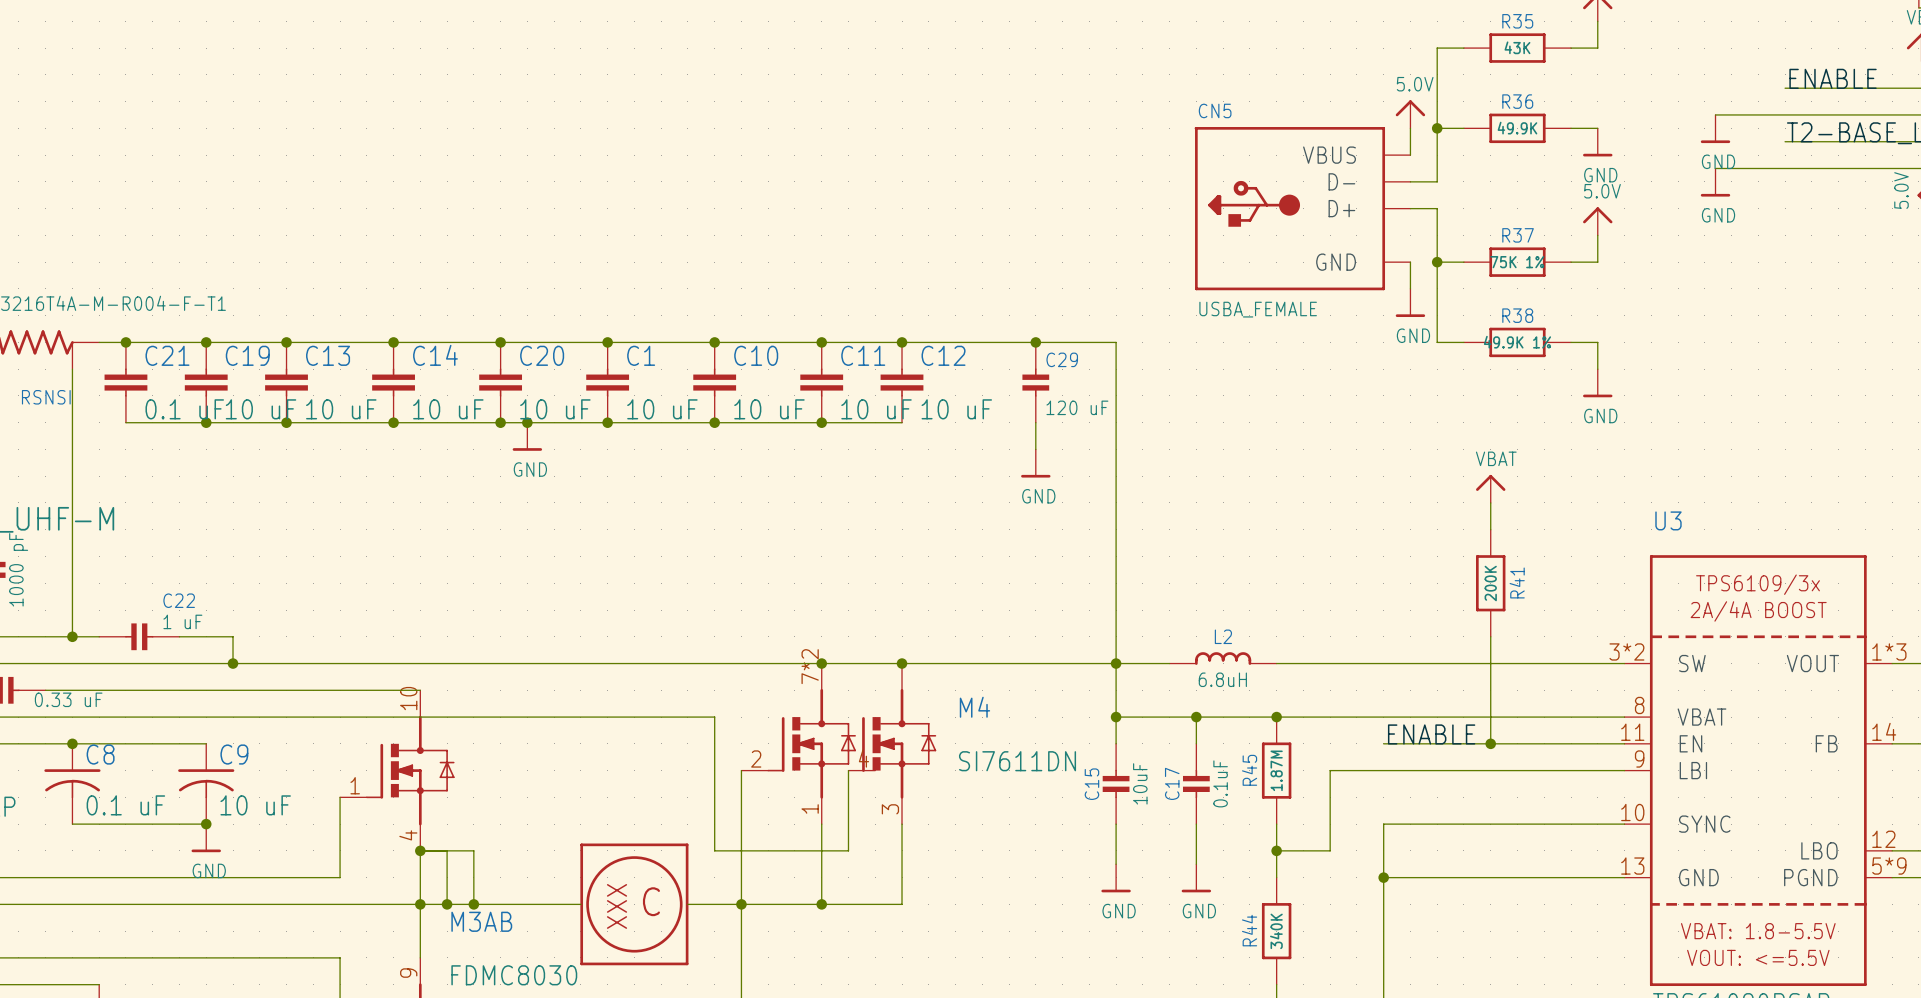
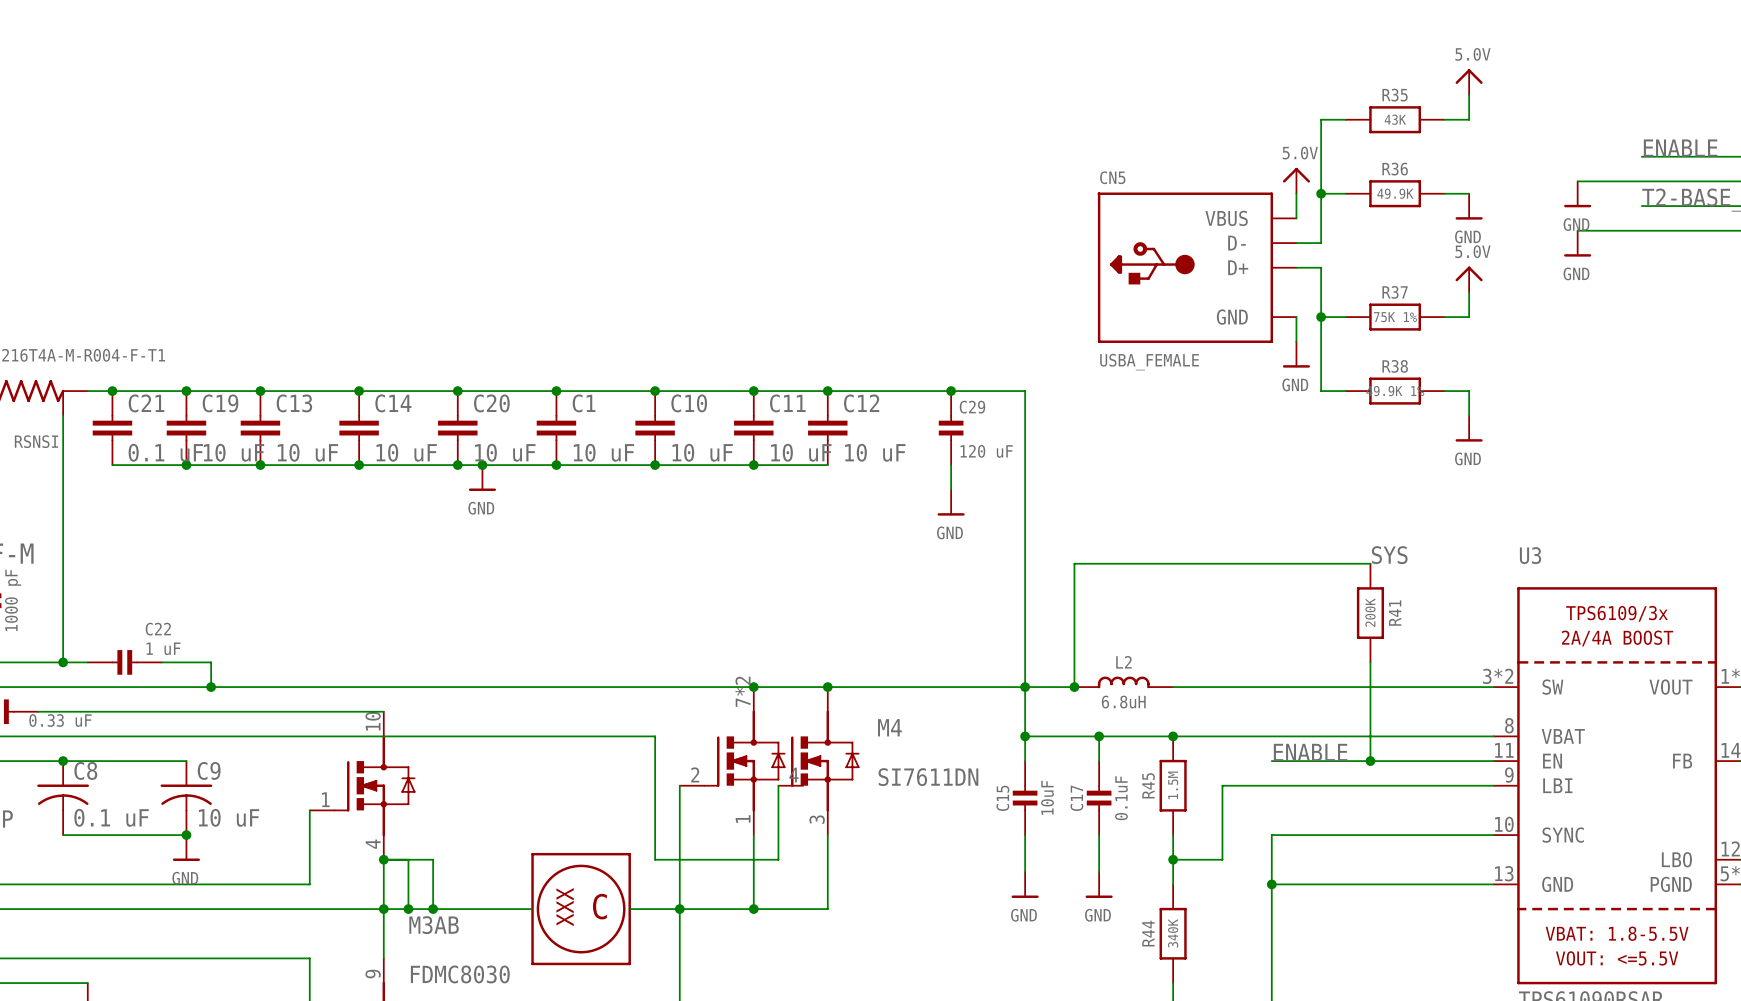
power symbol: VBAT (1490, 488) -> none
wire: (1490, 502) (1490, 529) -> (1074, 687) (1074, 563) (1370, 563)
label: none -> SYS (1389, 555)
junction: none -> (1074, 687)
R45 value: 1.87M (1276, 770) -> 1.5M (1173, 785)

